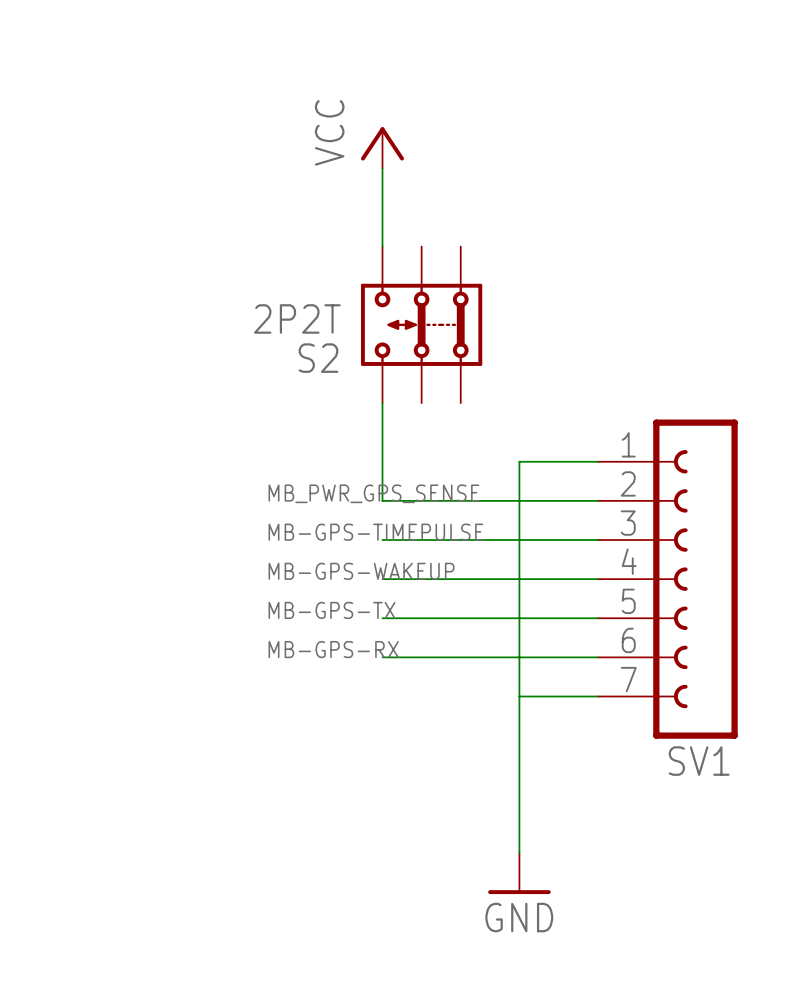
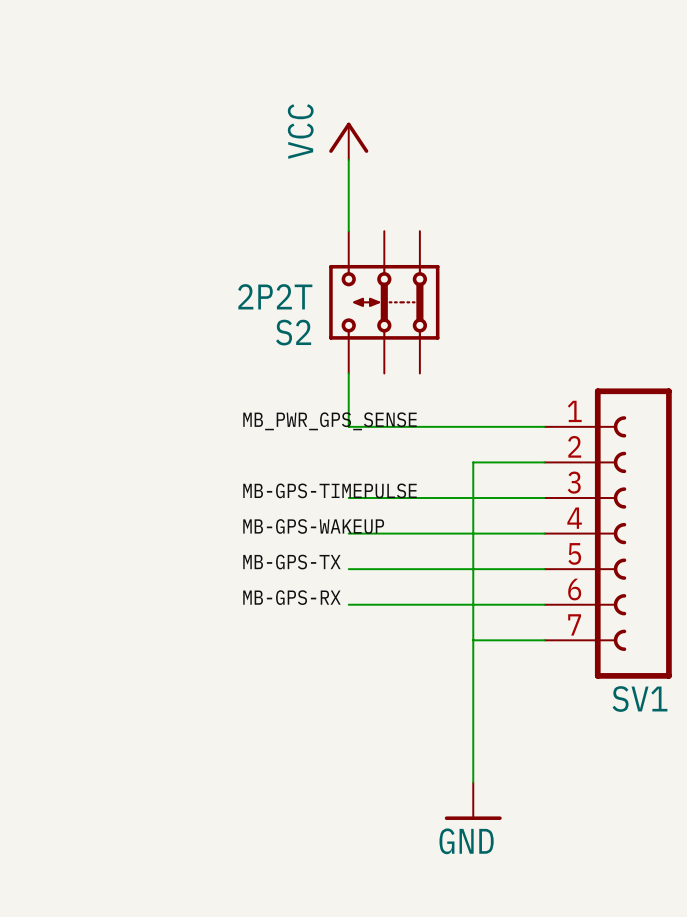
wire: (382, 461) (382, 500) (519, 500) (519, 461) -> (348, 426) (473, 426)
label position: MB_PWR_GPS_SENSE (373, 493) -> MB_PWR_GPS_SENSE (329, 421)

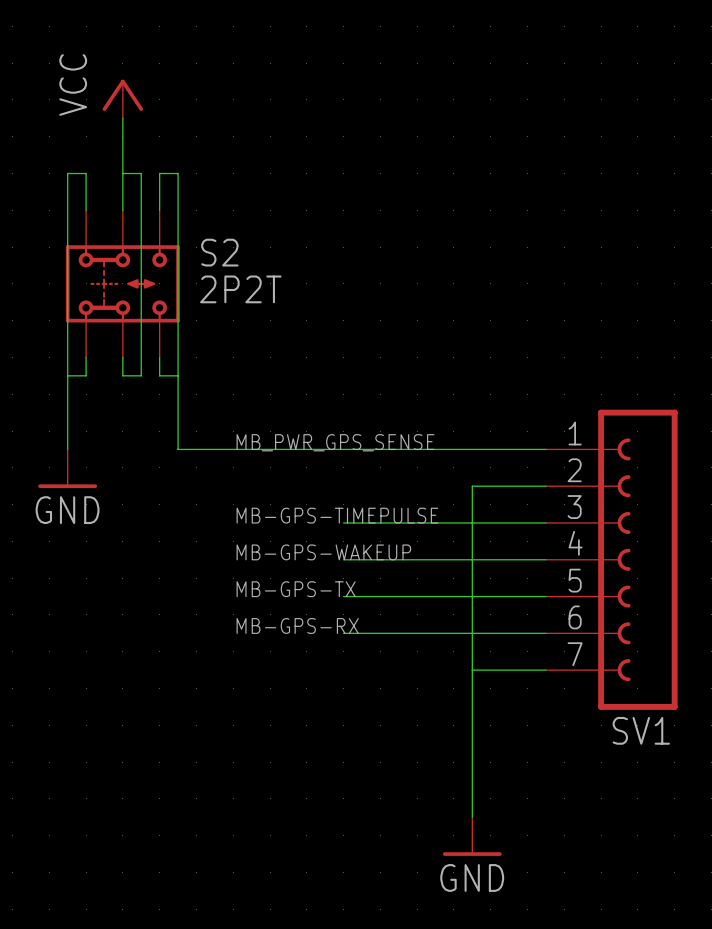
wire: none -> (122, 118) (122, 210)
power symbol position: VCC (348, 141) -> VCC (122, 99)
wire: none -> (122, 173) (141, 173) (141, 375) (122, 375) (122, 357)
wire: (348, 160) (348, 231) -> none
wire: none -> (86, 210) (86, 173) (67, 173) (67, 449)
S2 symbol: [329, 231, 440, 374] -> [65, 210, 180, 358]
S2 value position: 2P2T (275, 296) -> 2P2T (240, 289)
S2 name position: S2 (293, 332) -> S2 (219, 252)
wire: none -> (86, 357) (86, 375) (67, 375)
wire: none -> (159, 357) (159, 375) (178, 375)
wire: (348, 373) (348, 426) -> (159, 210) (159, 173) (178, 173) (178, 449) (343, 449)
power symbol: none -> GND (67, 468)

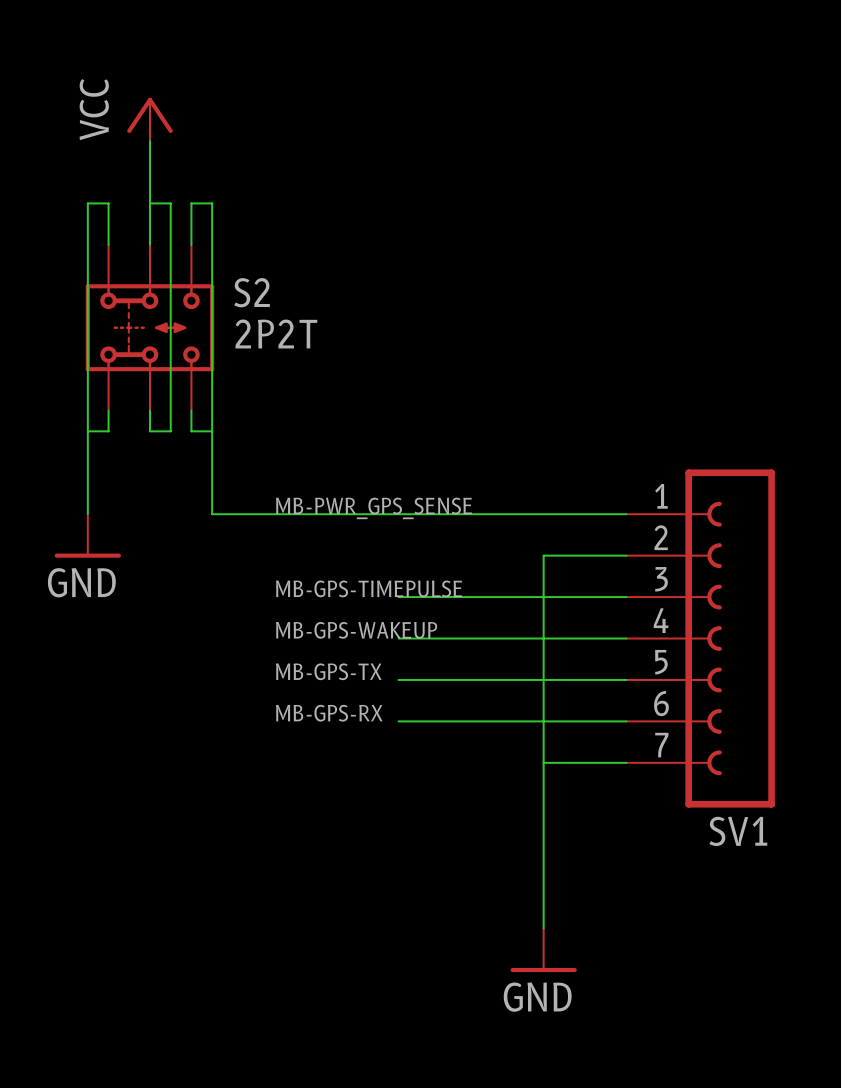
label: MB_PWR_GPS_SENSE (335, 442) -> MB-PWR_GPS_SENSE (374, 508)

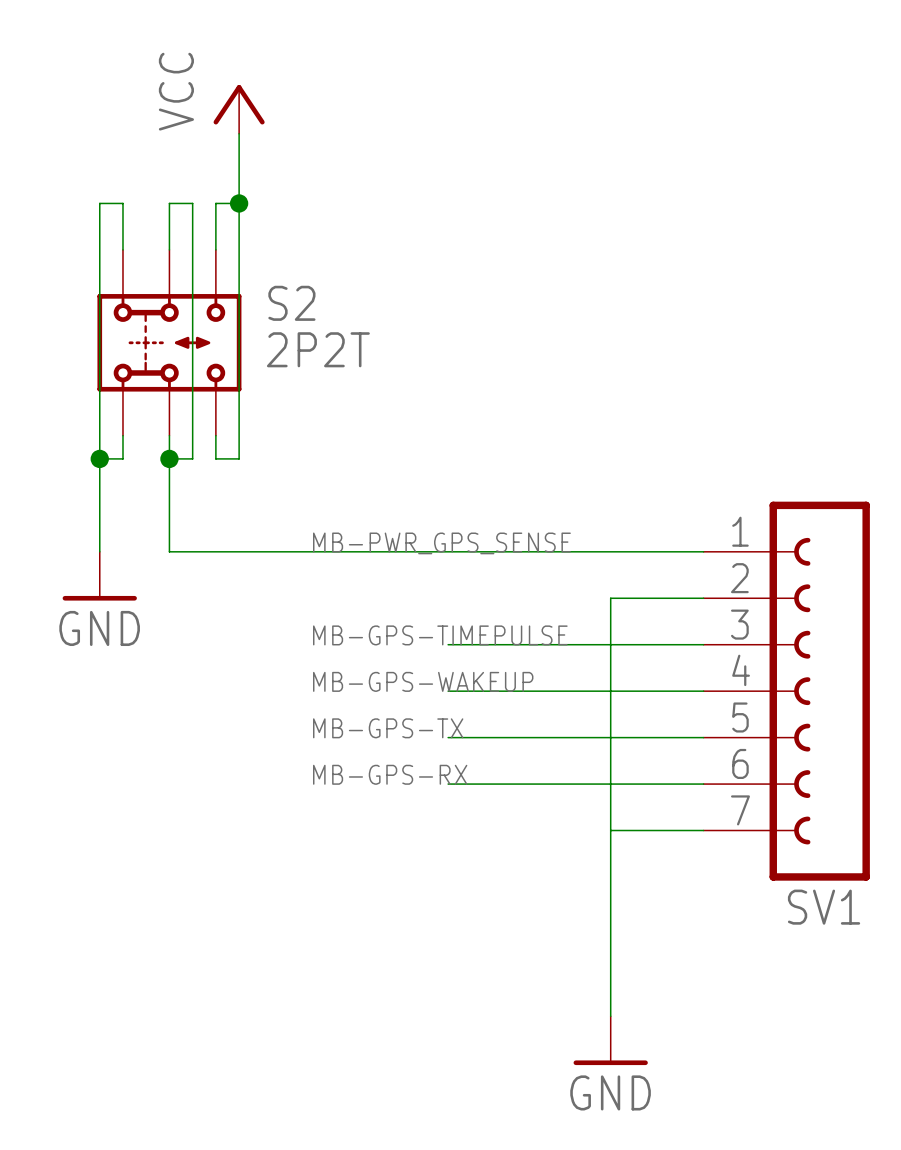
power symbol position: VCC (149, 119) -> VCC (239, 109)
wire: (149, 141) (149, 203) -> (239, 133) (239, 203)
junction: none -> (239, 203)
junction: none -> (99, 458)
junction: none -> (169, 458)
wire: (212, 431) (212, 514) -> (169, 458) (169, 551) (239, 551)

